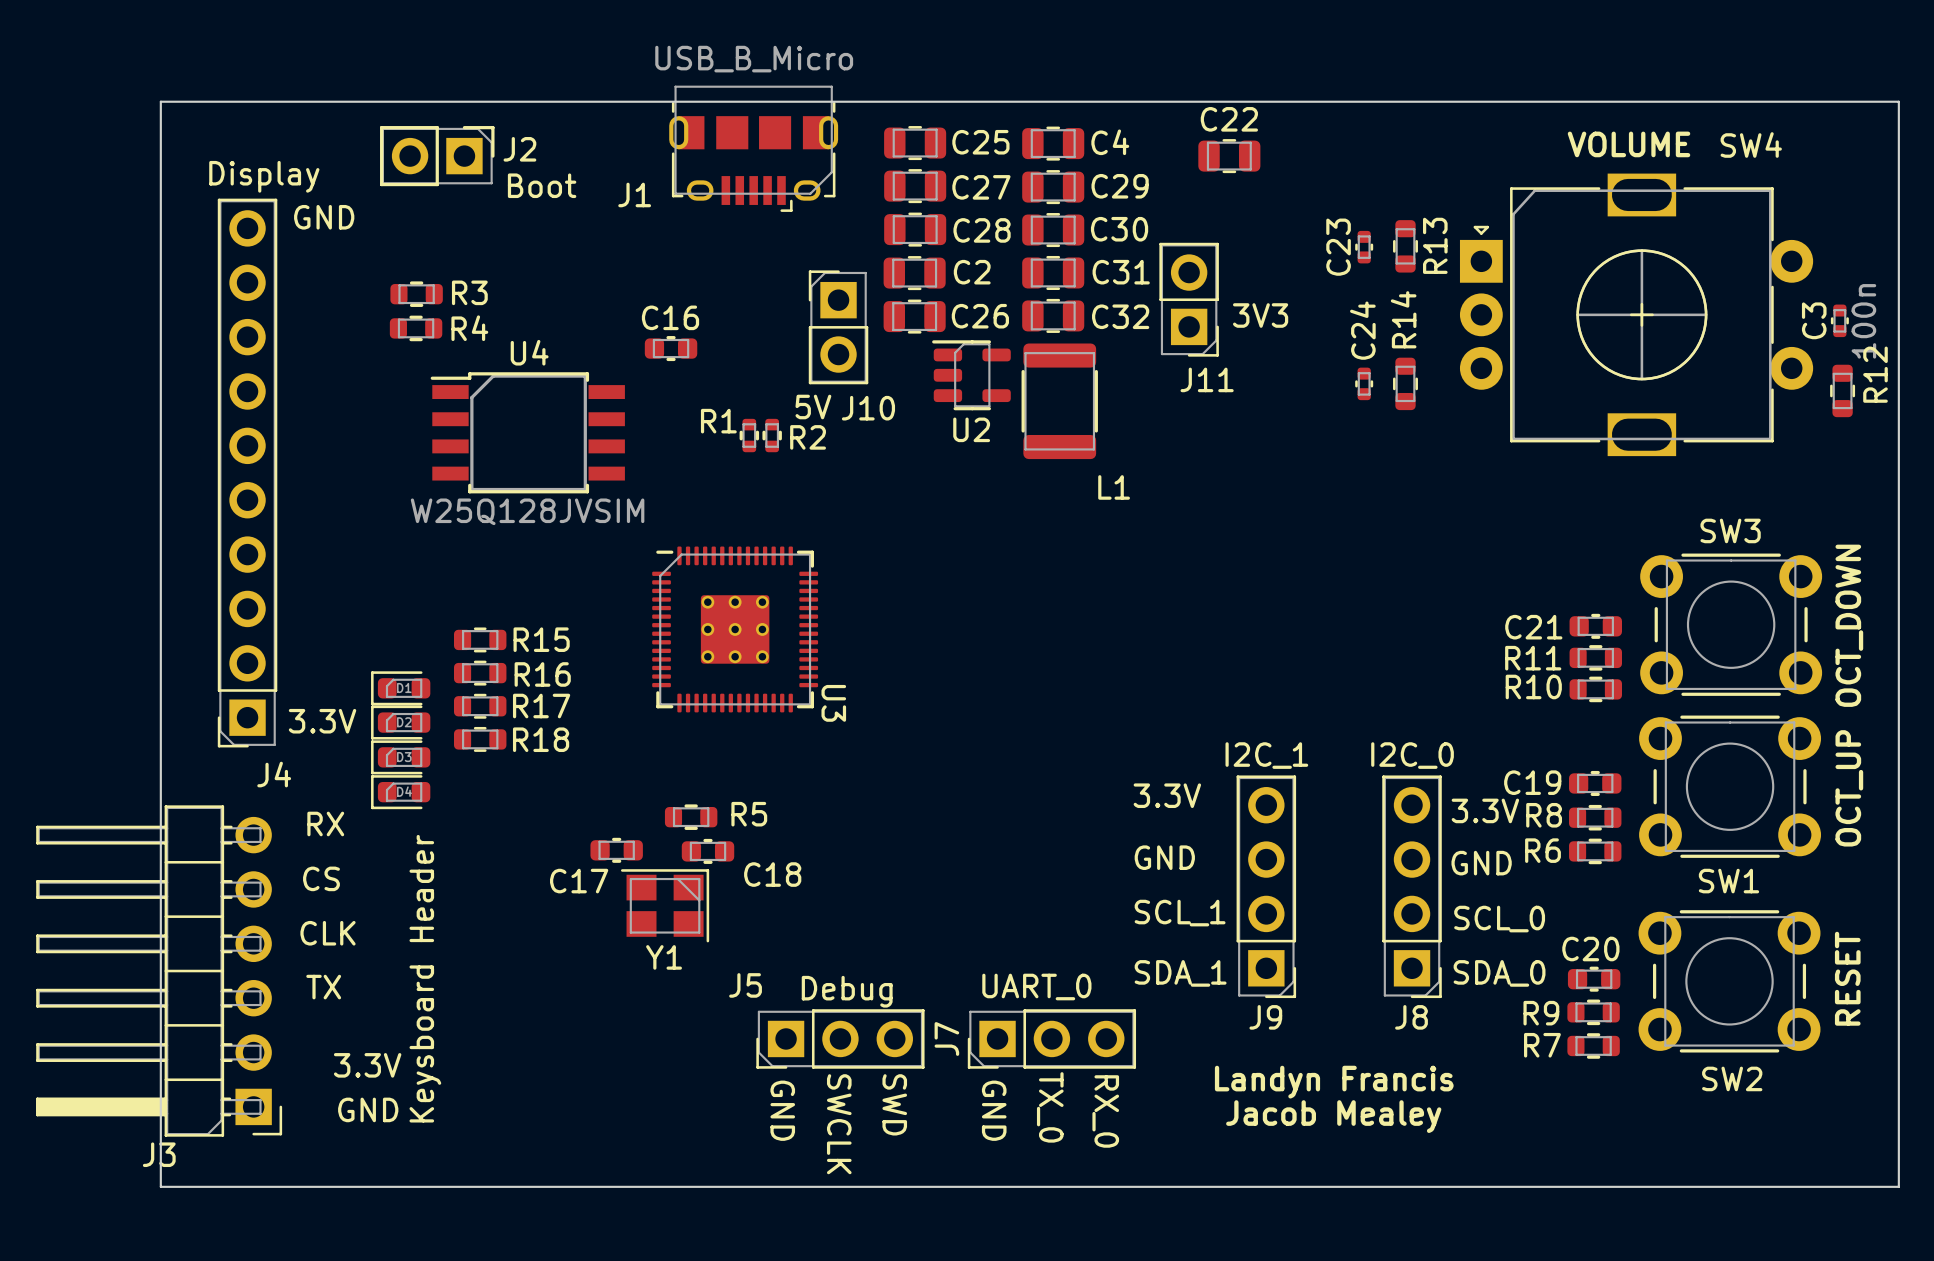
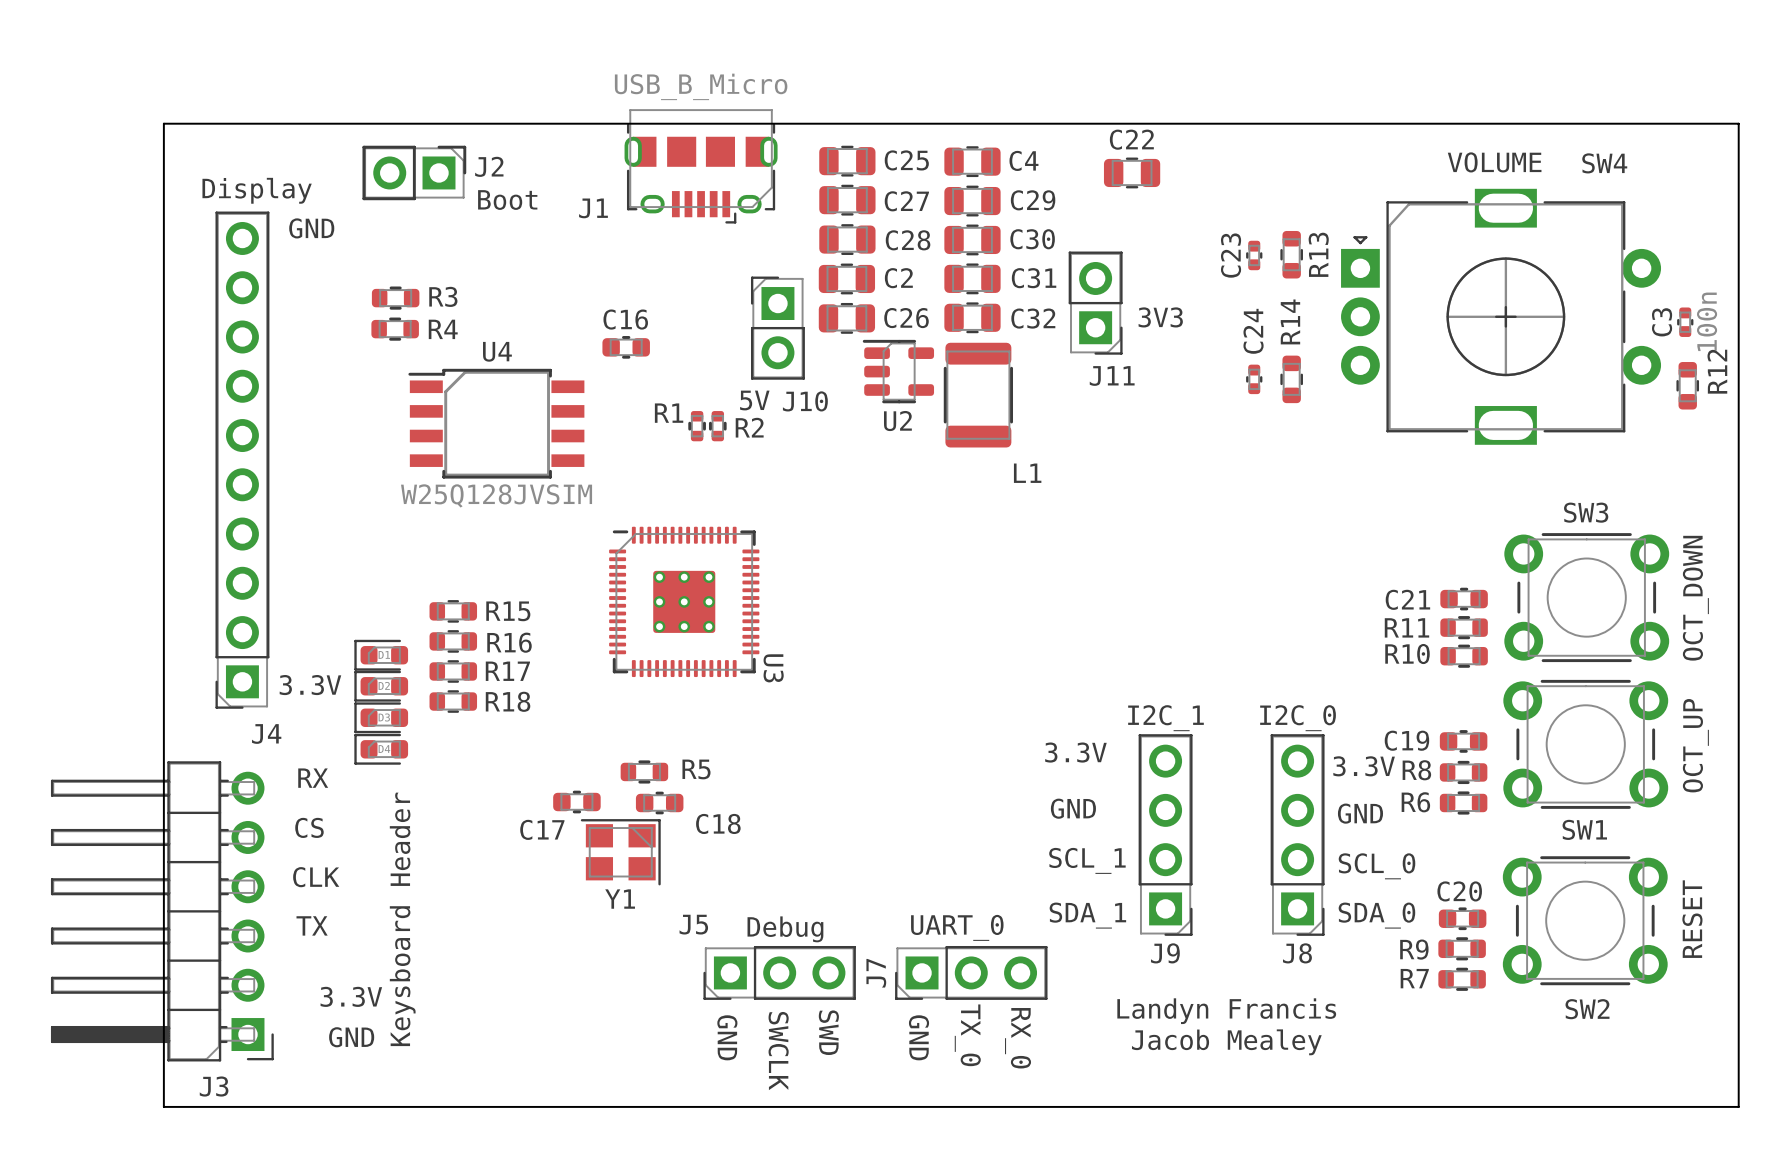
J3 name position: J3 (159, 1154) -> J3 (214, 1086)

